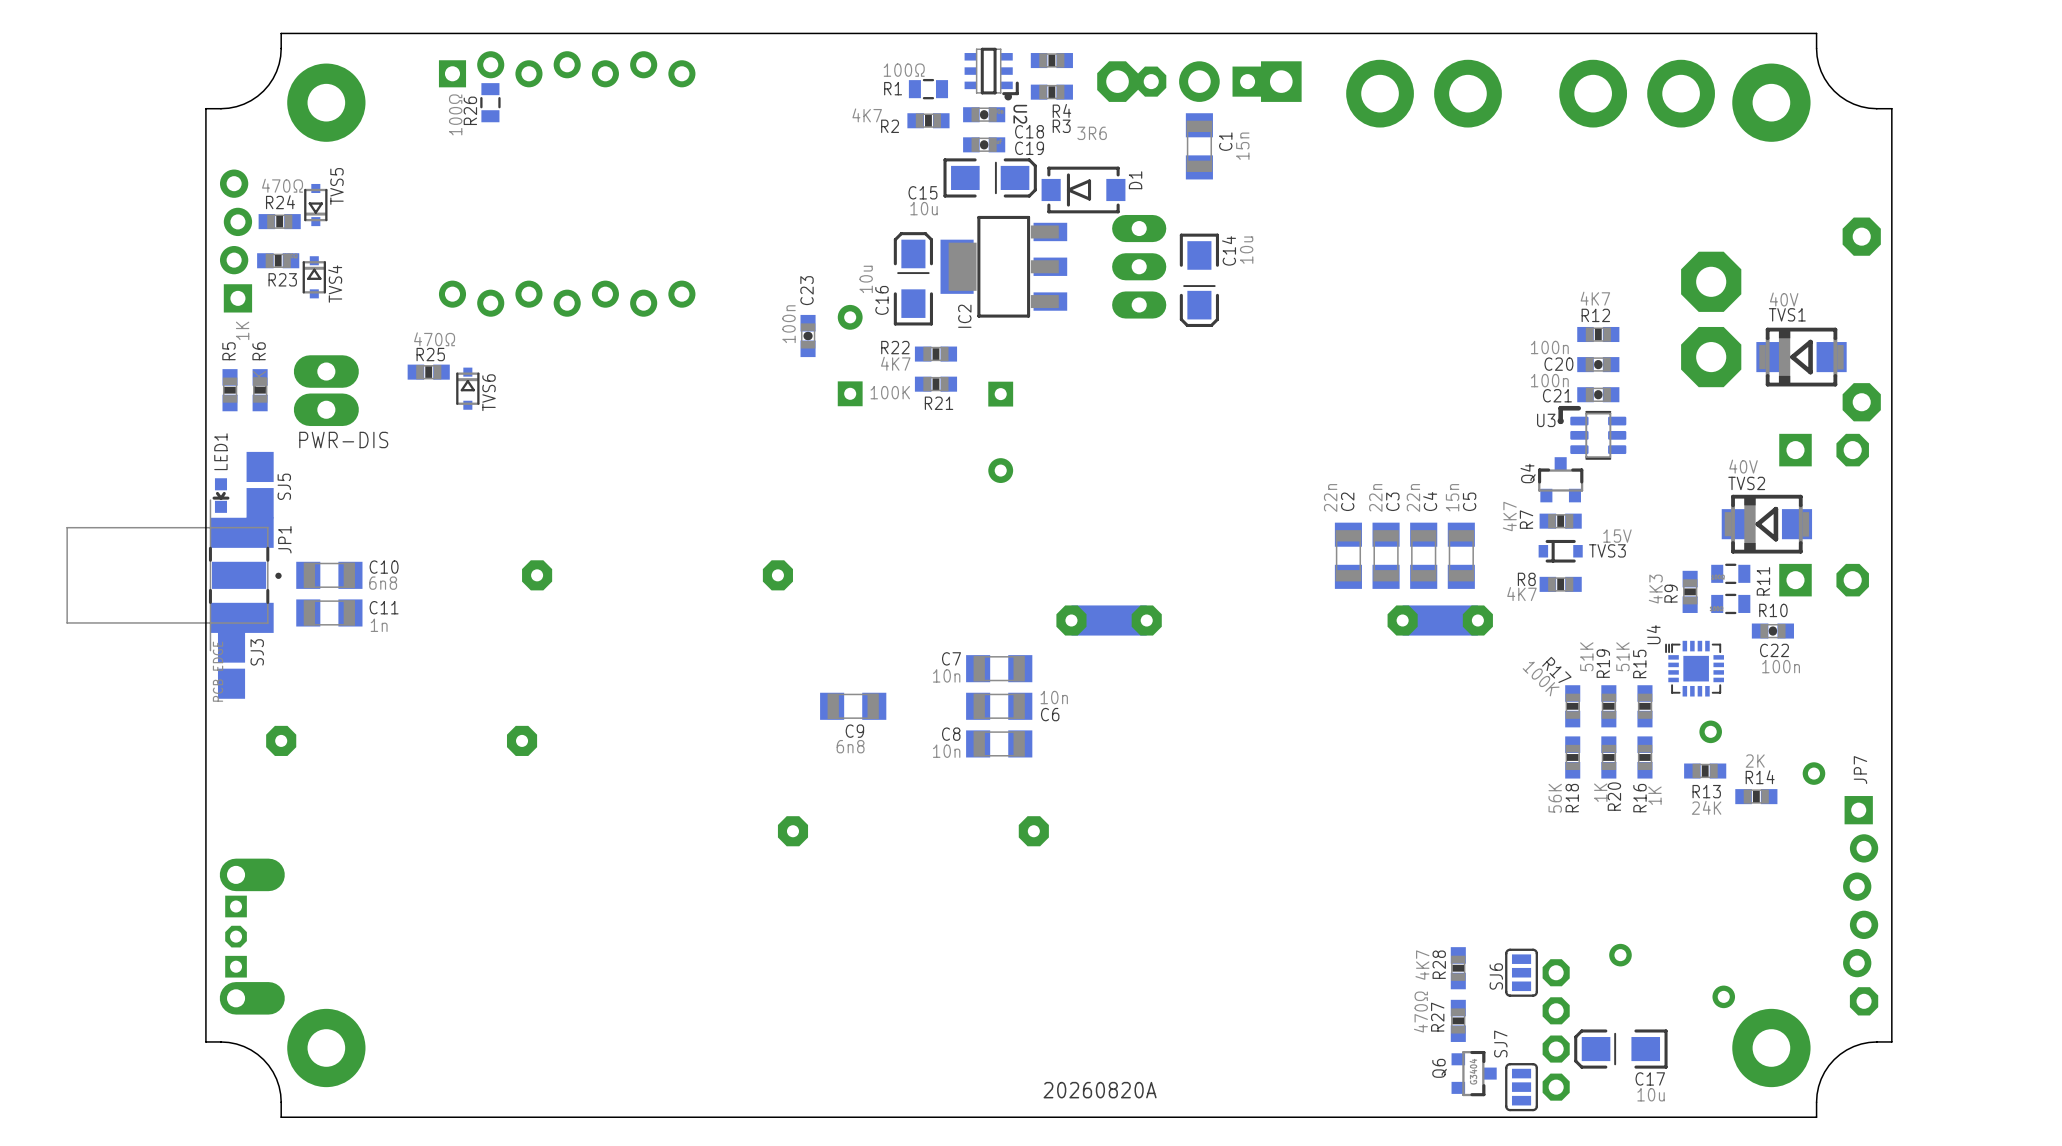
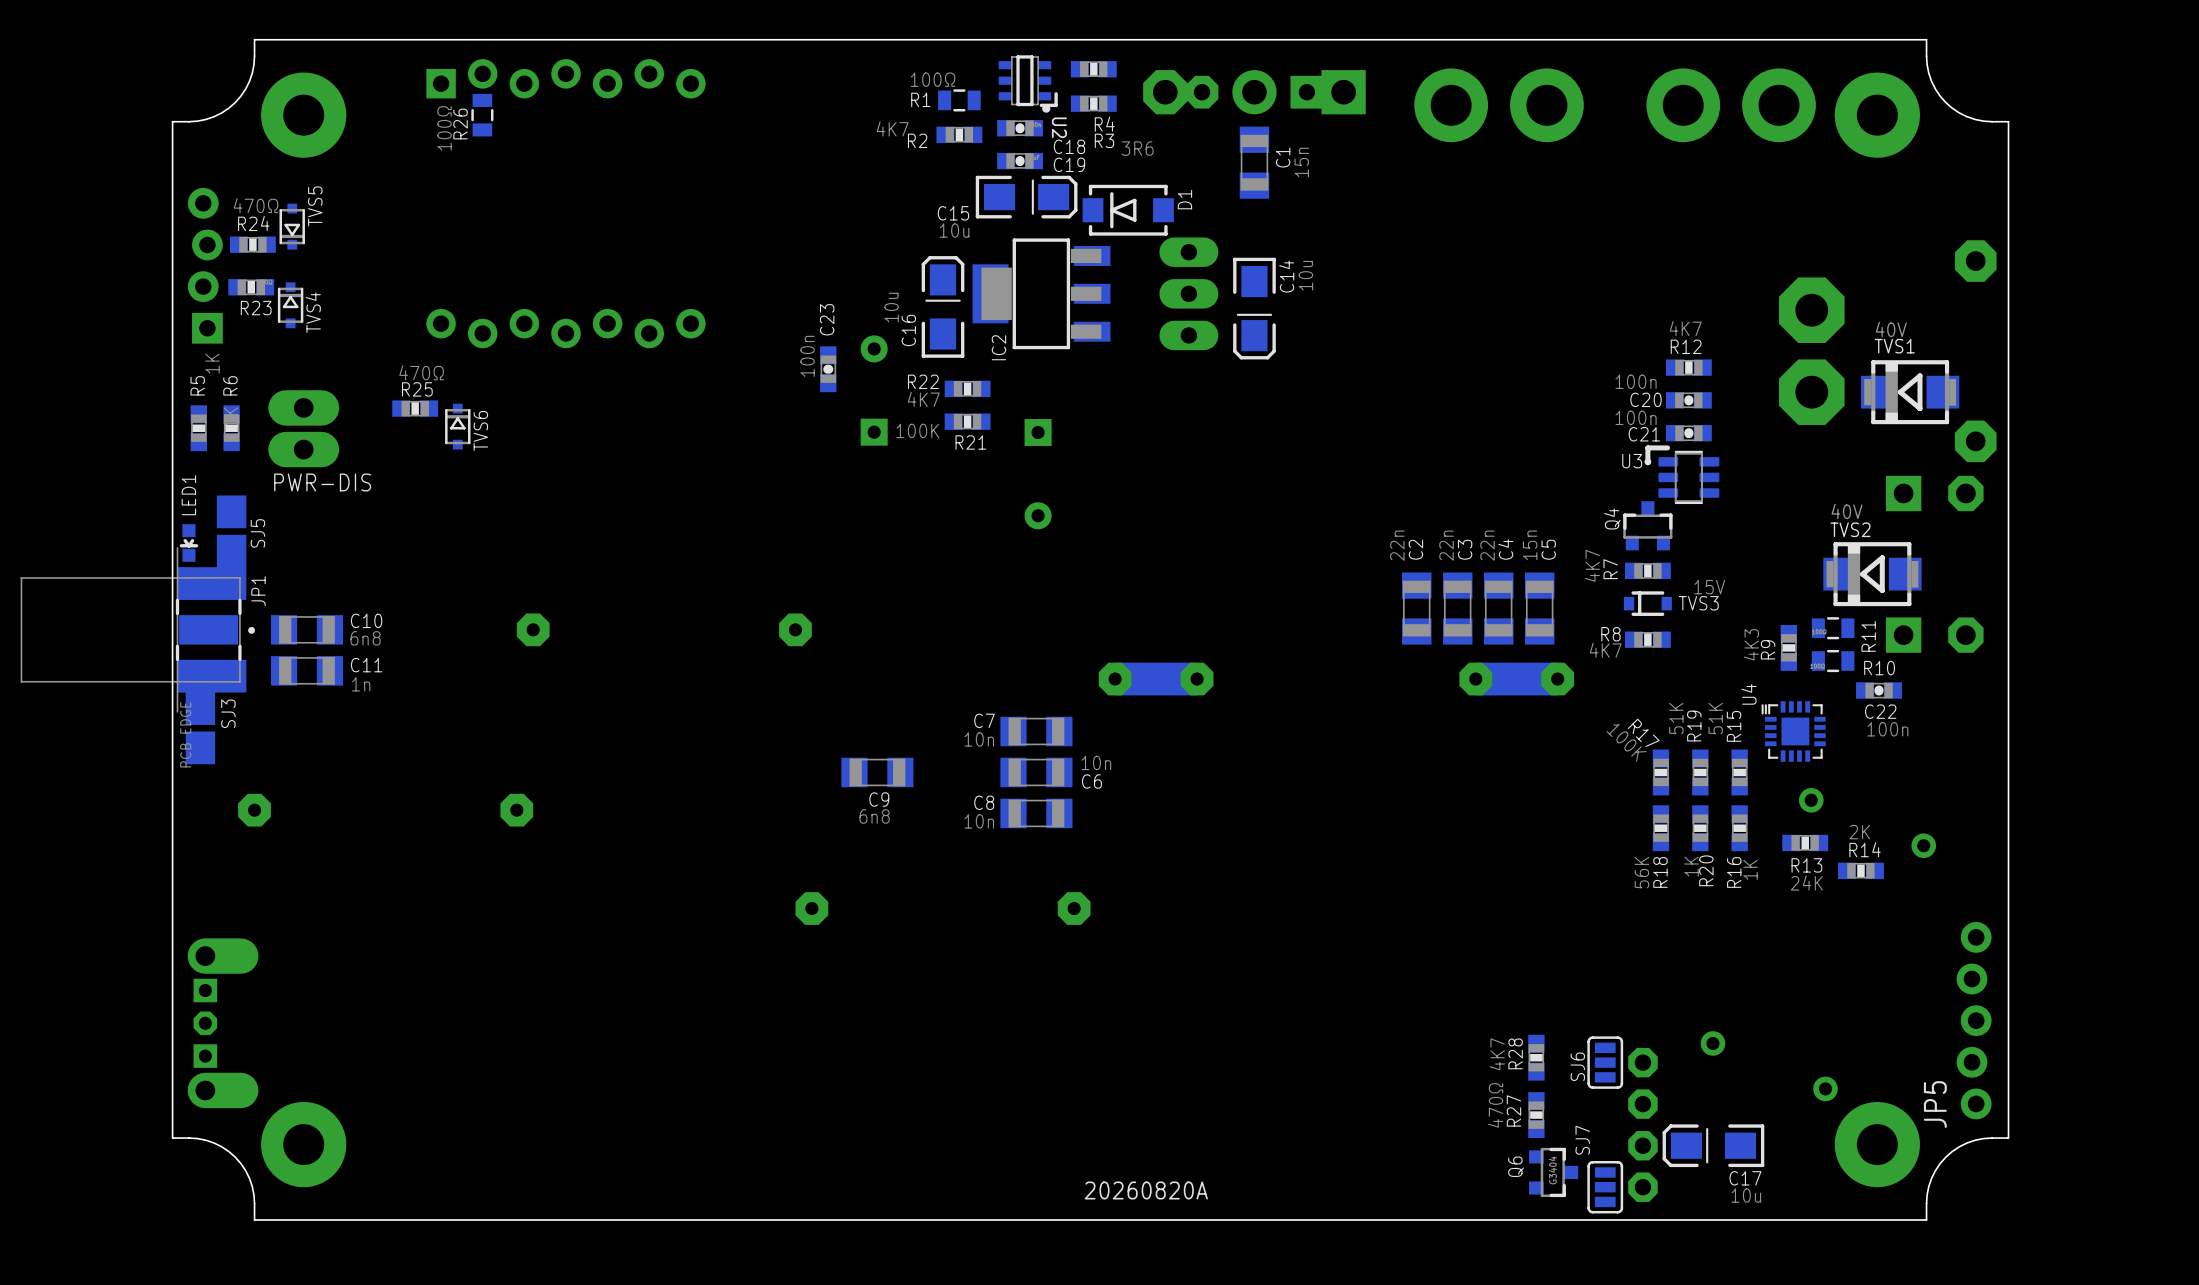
JP7: (1860, 905) -> none
JP5: none -> (1974, 1020)

